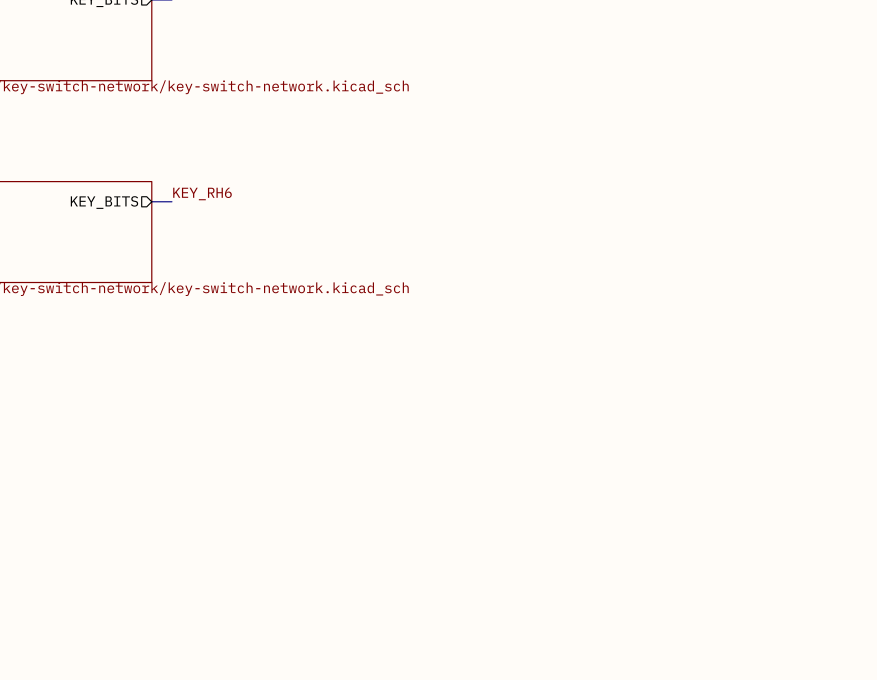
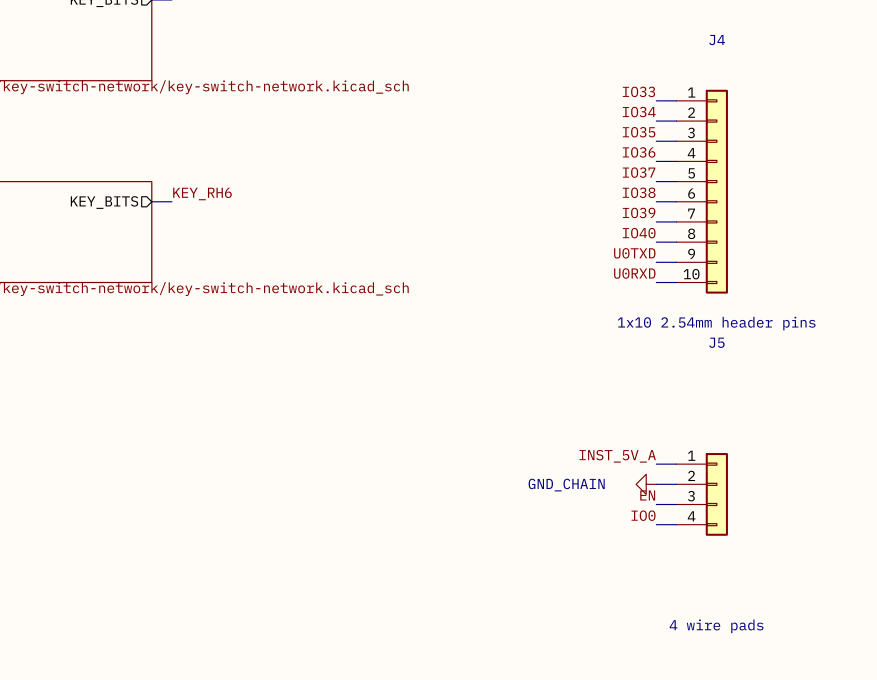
label: none -> IO33 (638, 91)
wire: none -> (656, 100) (676, 100)
label: none -> IO34 (639, 112)
wire: none -> (656, 121) (676, 121)
label: none -> IO35 (639, 132)
wire: none -> (656, 141) (676, 141)
label: none -> IO36 (639, 152)
wire: none -> (656, 161) (676, 161)
label: none -> IO37 (639, 172)
wire: none -> (656, 181) (676, 181)
J4: none -> 1x10 2.54mm header pins (702, 191)
label: none -> IO38 (639, 192)
wire: none -> (656, 201) (676, 201)
label: none -> IO39 (639, 212)
wire: none -> (656, 221) (676, 221)
label: none -> IO40 (639, 233)
wire: none -> (656, 242) (676, 242)
label: none -> U0TXD (634, 253)
wire: none -> (656, 262) (676, 262)
label: none -> U0RXD (634, 273)
wire: none -> (656, 282) (676, 282)
label: none -> INST_5V_A (617, 456)
wire: none -> (656, 464) (676, 464)
power symbol: none -> GND_CHAIN (646, 484)
wire: none -> (656, 484) (676, 484)
J5: none -> 4 wire pads (702, 494)
label: none -> EN (647, 495)
wire: none -> (656, 504) (676, 504)
label: none -> IO0 (643, 515)
wire: none -> (656, 524) (676, 524)

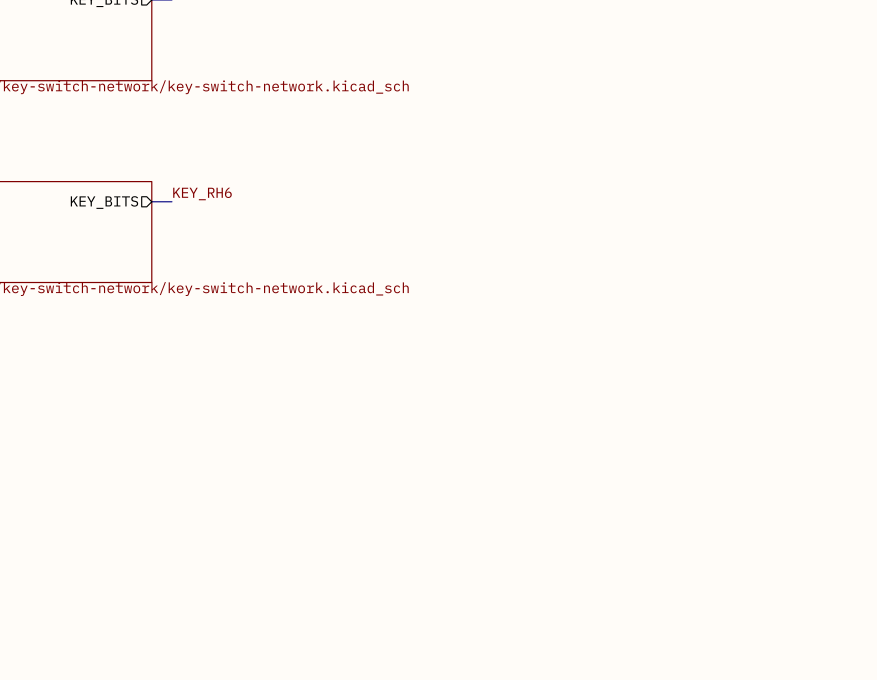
label: IO33 (638, 91) -> none
wire: (656, 100) (676, 100) -> none
label: IO34 (639, 112) -> none
wire: (656, 121) (676, 121) -> none
label: IO35 (639, 132) -> none
wire: (656, 141) (676, 141) -> none
label: IO36 (639, 152) -> none
wire: (656, 161) (676, 161) -> none
label: IO37 (639, 172) -> none
wire: (656, 181) (676, 181) -> none
J4: 1x10 2.54mm header pins (702, 191) -> none
label: IO38 (639, 192) -> none
wire: (656, 201) (676, 201) -> none
label: IO39 (639, 212) -> none
wire: (656, 221) (676, 221) -> none
label: IO40 (639, 233) -> none
wire: (656, 242) (676, 242) -> none
label: U0TXD (634, 253) -> none
wire: (656, 262) (676, 262) -> none
label: U0RXD (634, 273) -> none
wire: (656, 282) (676, 282) -> none
label: INST_5V_A (617, 456) -> none
wire: (656, 464) (676, 464) -> none
power symbol: GND_CHAIN (646, 484) -> none
wire: (656, 484) (676, 484) -> none
J5: 4 wire pads (702, 494) -> none
label: EN (647, 495) -> none
wire: (656, 504) (676, 504) -> none
label: IO0 (643, 515) -> none
wire: (656, 524) (676, 524) -> none

